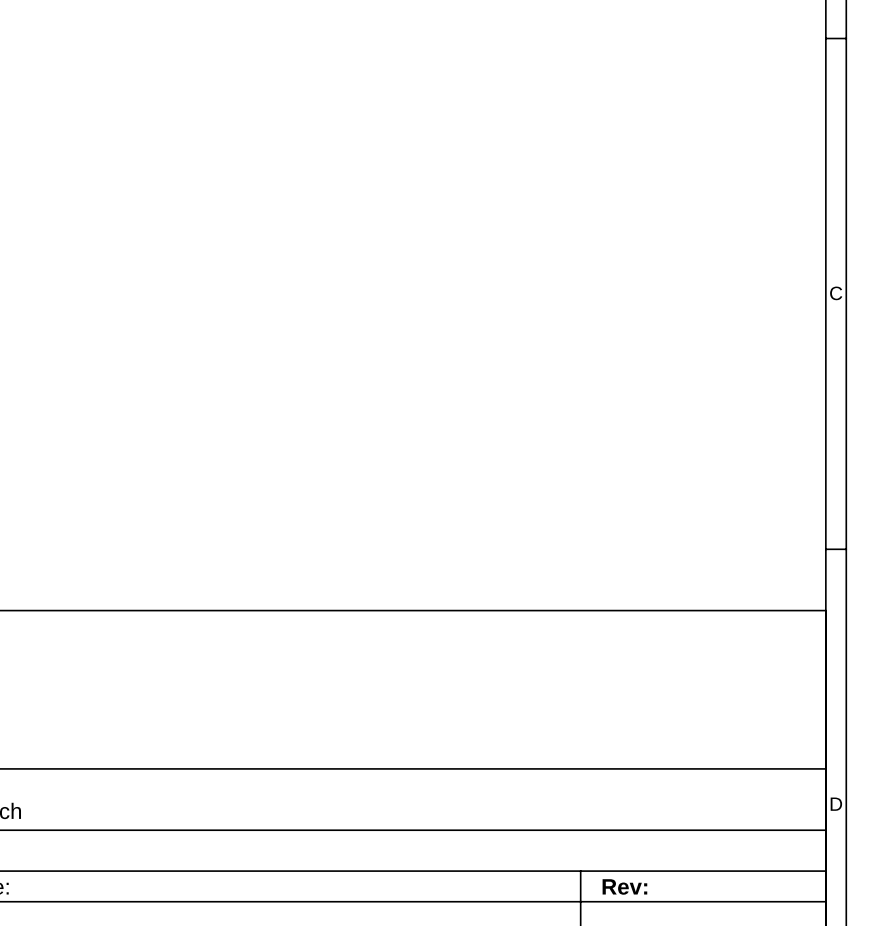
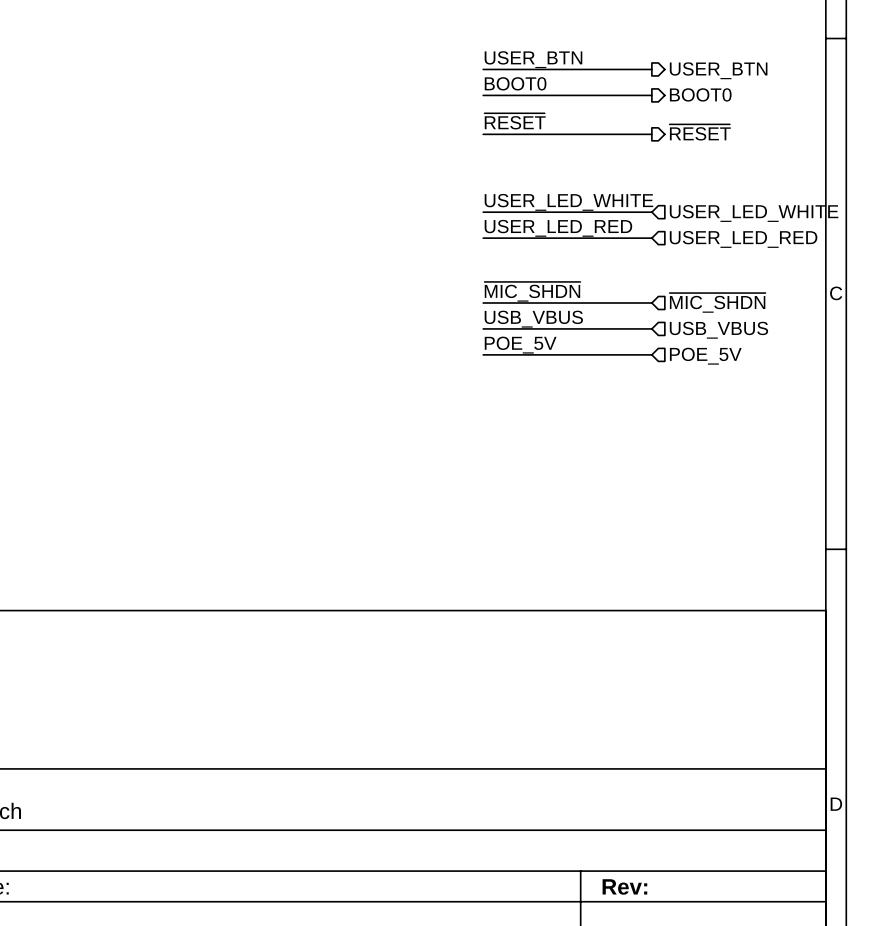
label: none -> USER_BTN (533, 59)
wire: none -> (483, 69) (651, 69)
hierarchical label: none -> USER_BTN (718, 70)
label: none -> BOOT0 (515, 83)
hierarchical label: none -> BOOT0 (700, 94)
wire: none -> (483, 95) (651, 95)
label: none -> ~{RESET} (515, 121)
hierarchical label: none -> ~{RESET} (700, 132)
wire: none -> (483, 134) (651, 134)
label: none -> USER_LED_WHITE (568, 202)
wire: none -> (483, 212) (651, 212)
hierarchical label: none -> USER_LED_WHITE (754, 213)
label: none -> USER_LED_RED (558, 228)
wire: none -> (483, 238) (651, 238)
hierarchical label: none -> USER_LED_RED (743, 239)
label: none -> ~{MIC_SHDN} (532, 291)
hierarchical label: none -> ~{MIC_SHDN} (717, 302)
wire: none -> (483, 303) (651, 303)
label: none -> USB_VBUS (533, 319)
wire: none -> (483, 328) (651, 328)
hierarchical label: none -> USB_VBUS (718, 330)
label: none -> POE_5V (520, 345)
wire: none -> (483, 354) (651, 354)
hierarchical label: none -> POE_5V (705, 356)

